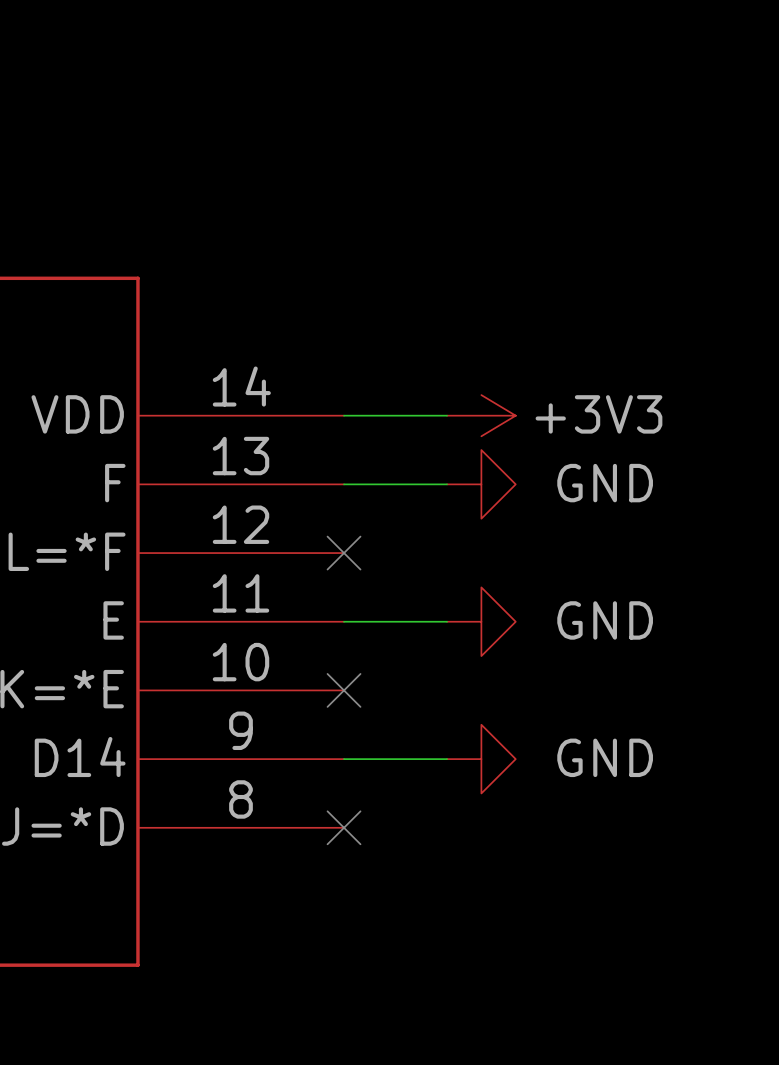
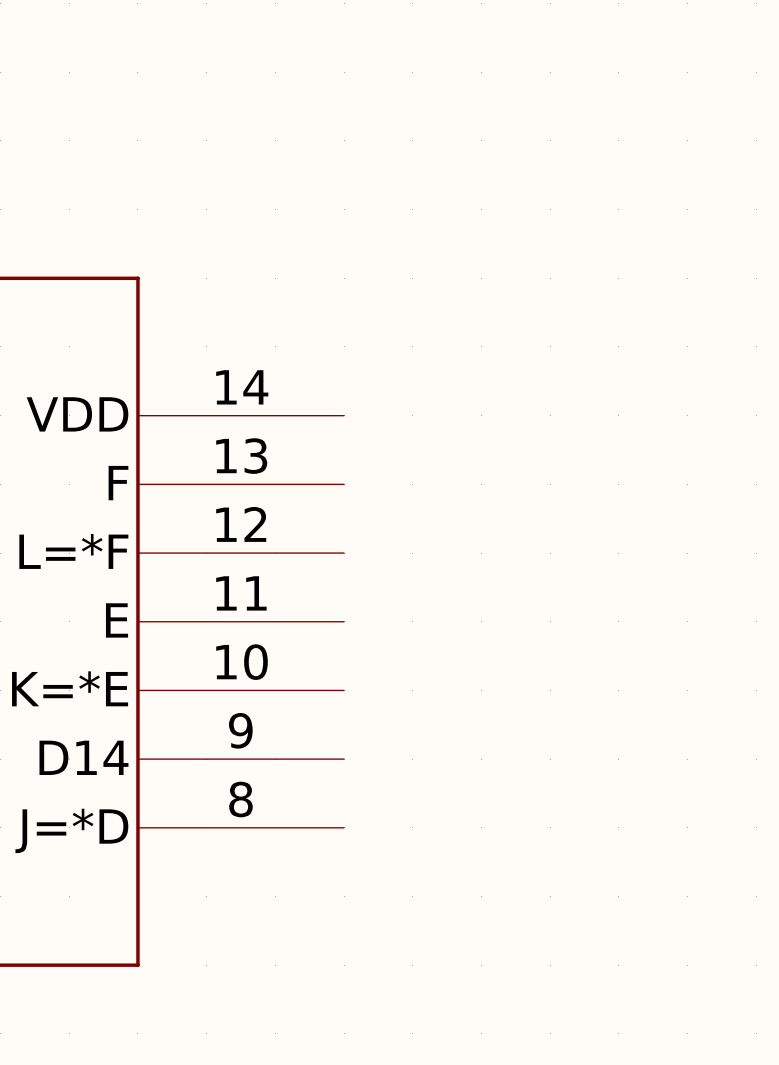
wire: (344, 415) (447, 415) -> none
power symbol: +3V3 (481, 415) -> none
wire: (344, 484) (447, 484) -> none
power symbol: GND (481, 484) -> none
no-connect mark: (344, 553) -> none
wire: (344, 621) (447, 621) -> none
power symbol: GND (481, 621) -> none
no-connect mark: (344, 690) -> none
wire: (344, 759) (447, 759) -> none
power symbol: GND (481, 759) -> none
no-connect mark: (344, 827) -> none

